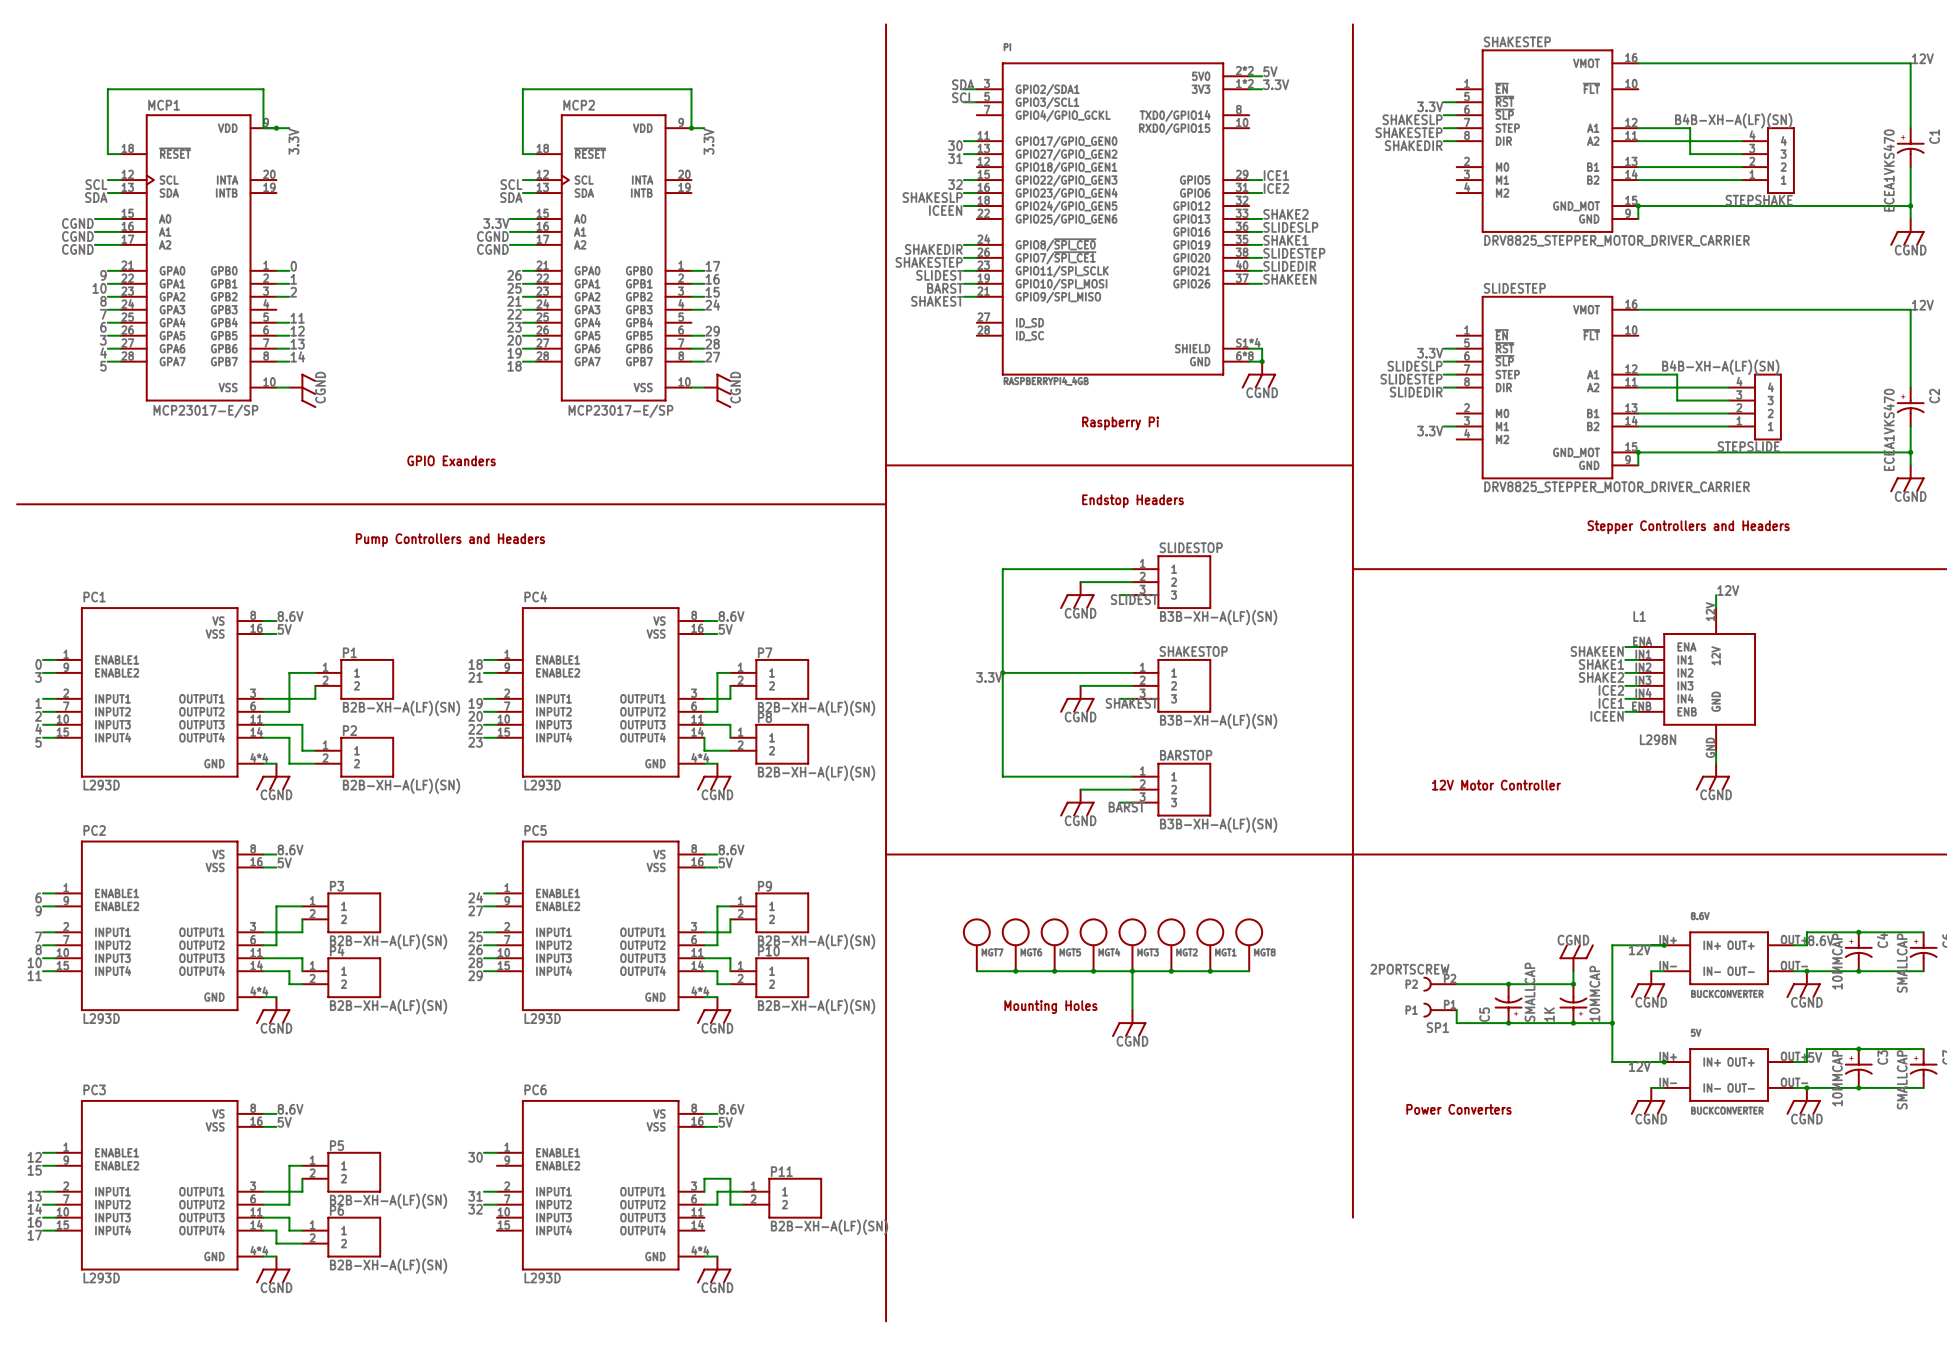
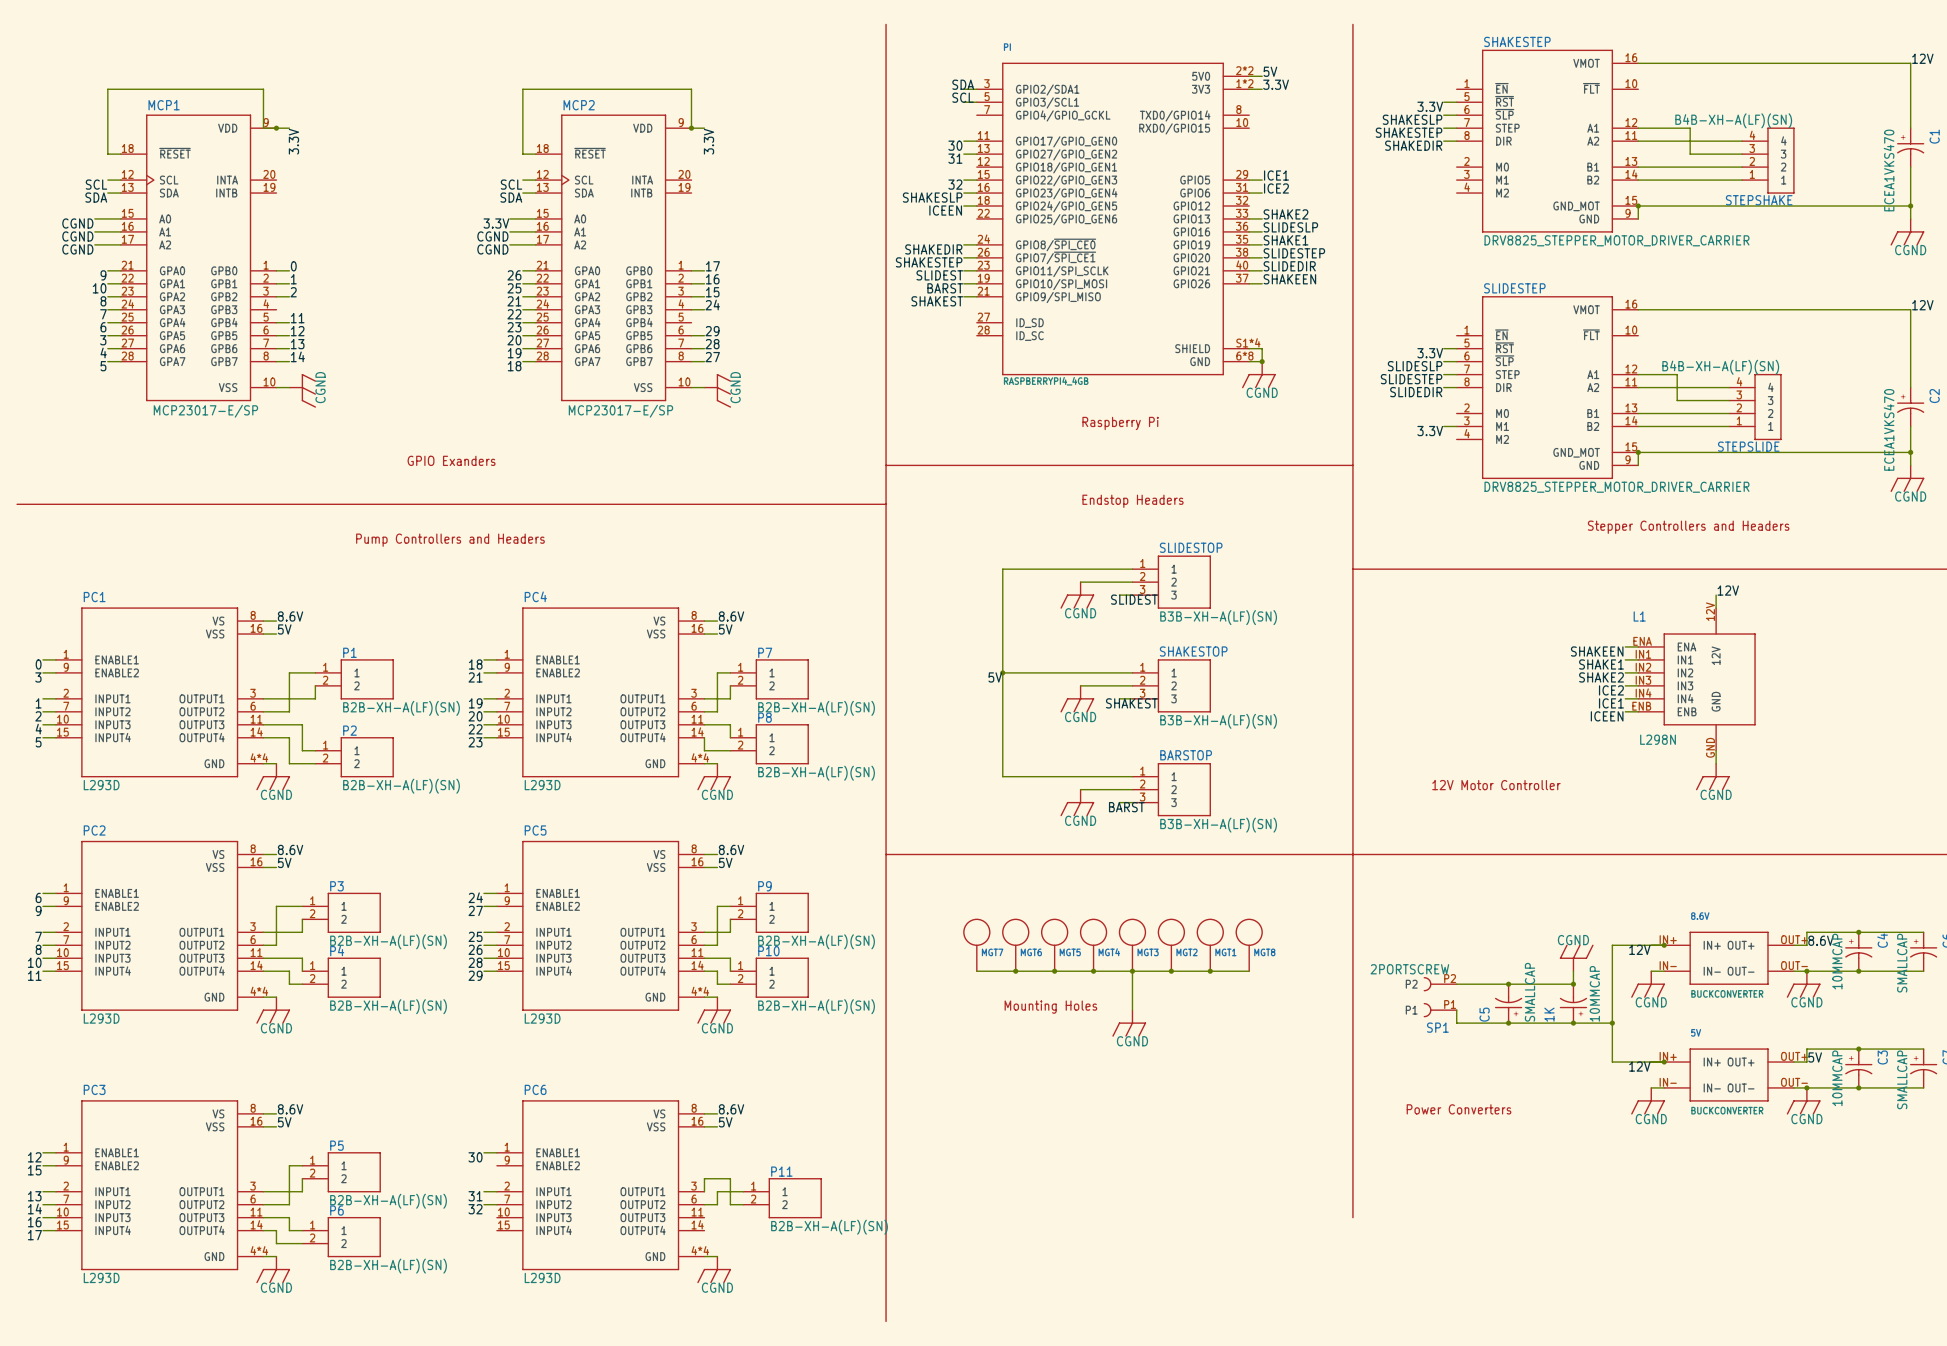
label: 3.3V (989, 677) -> 5V (995, 677)

